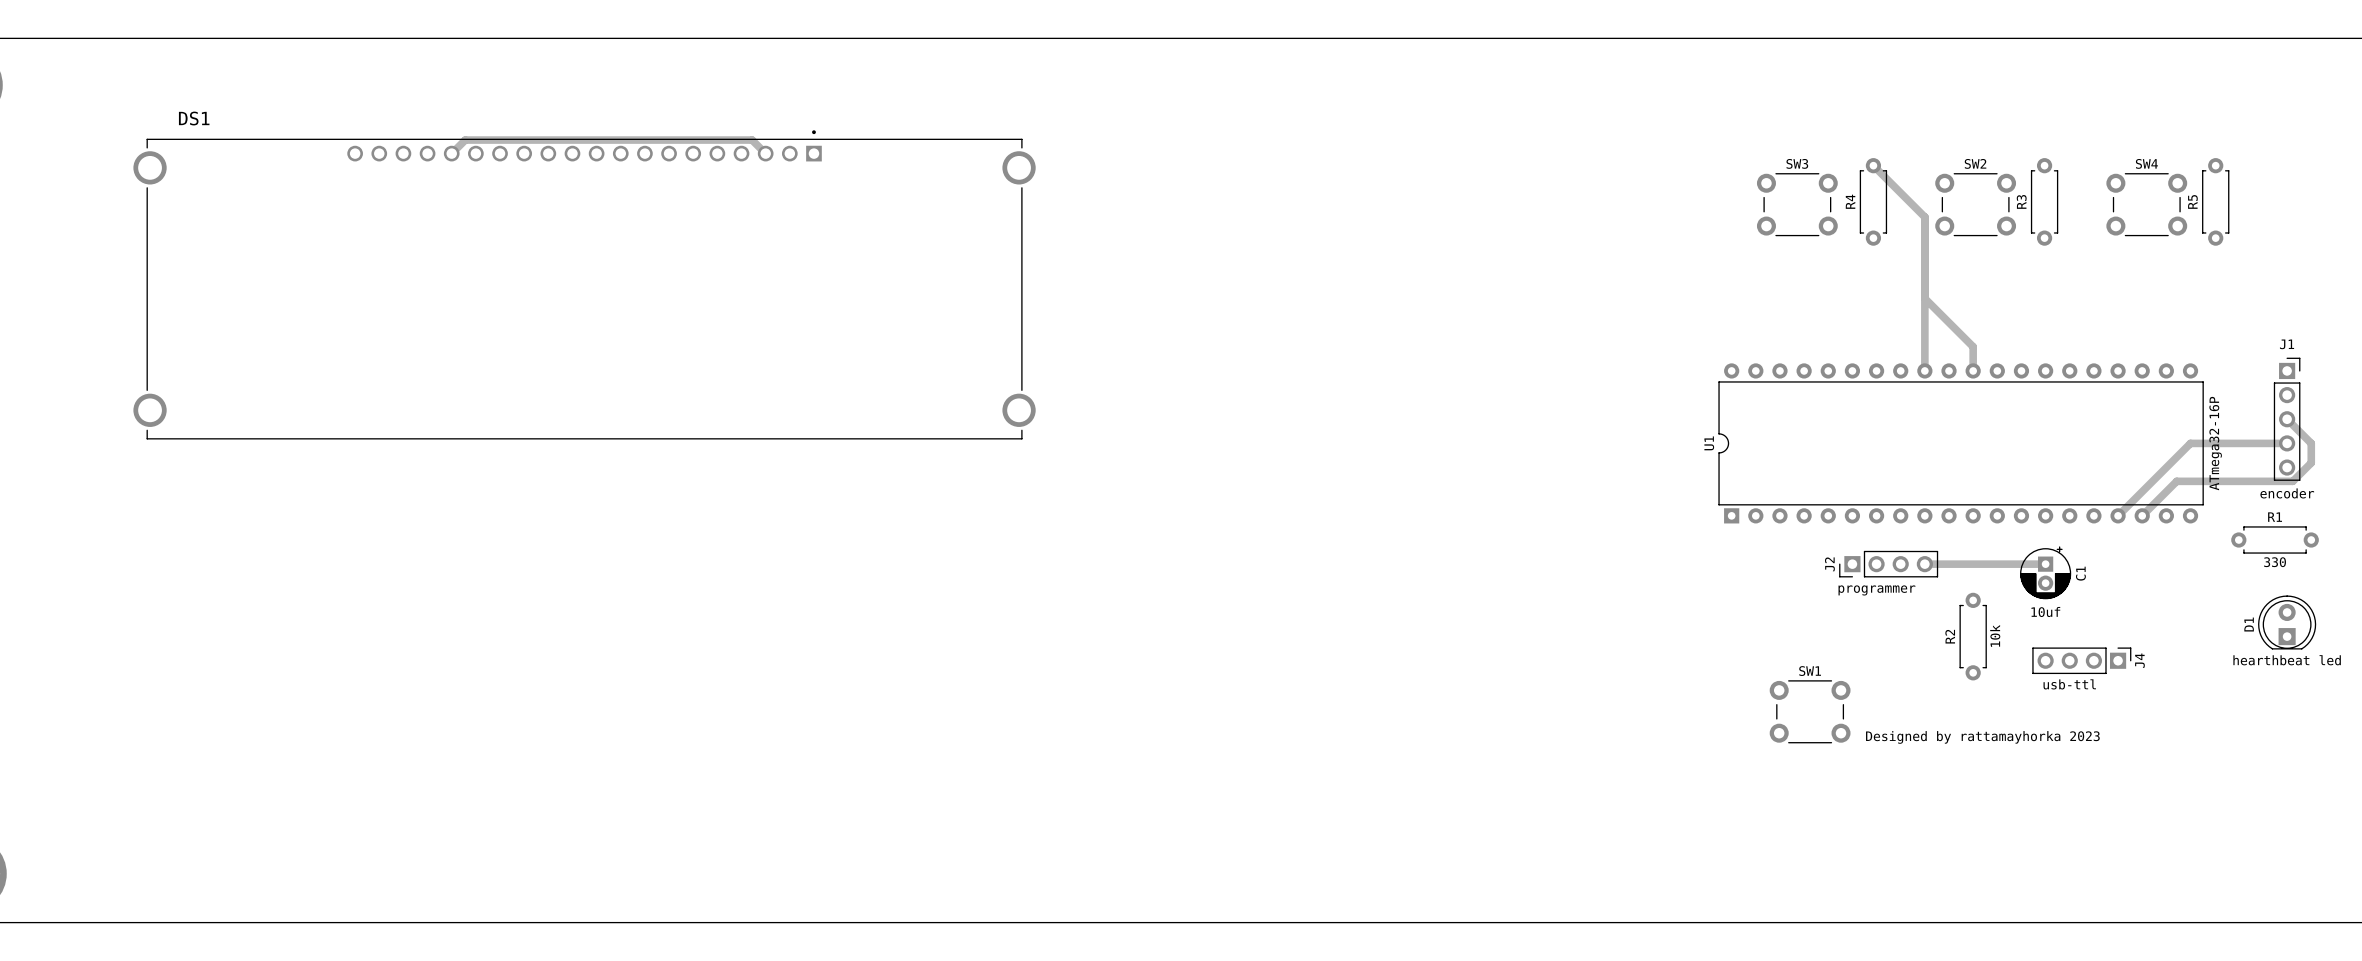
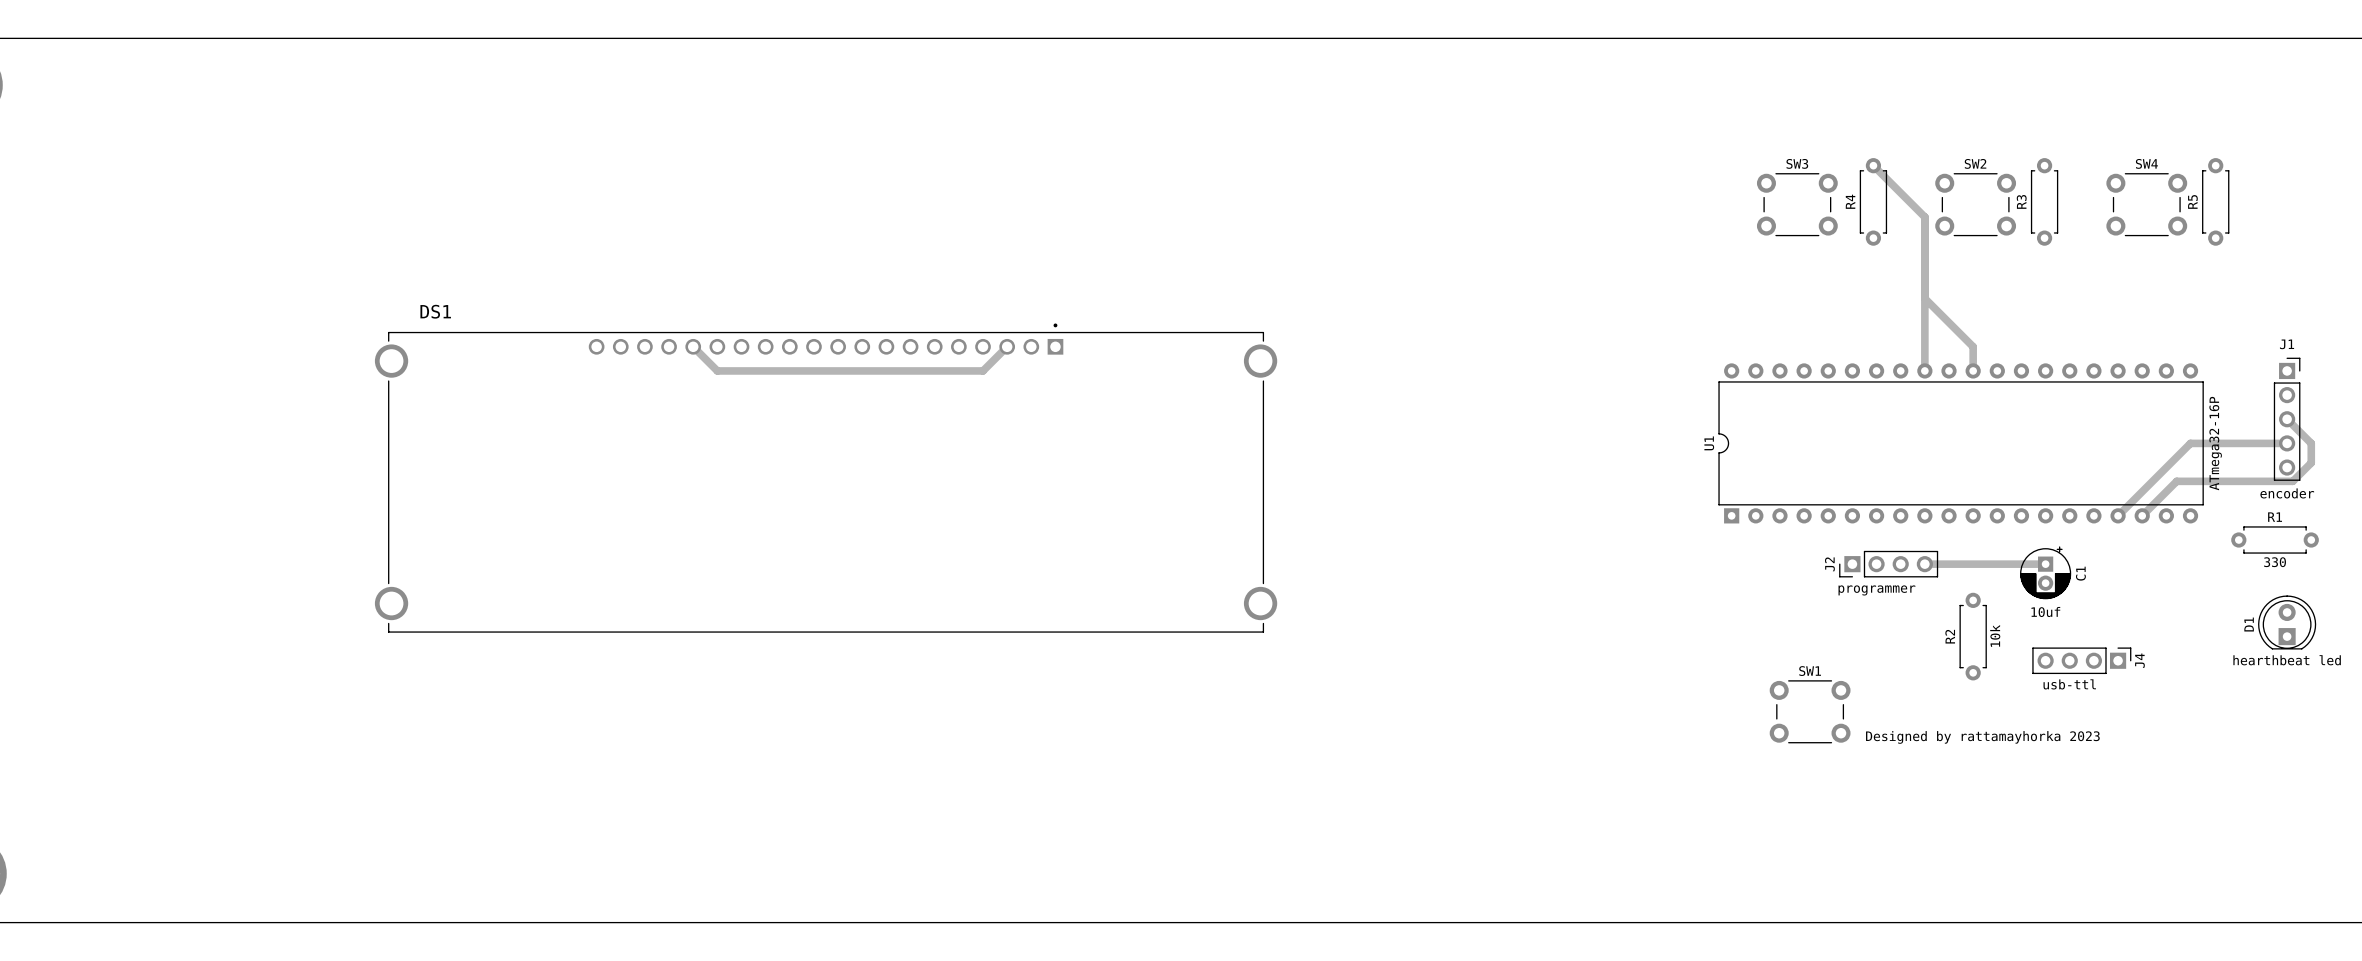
track: (451, 153) (465, 140) (752, 140) (765, 153) -> none
DS1 position: (584, 284) -> (826, 478)
track: none -> (693, 346) (717, 370) (983, 370) (1007, 346)

